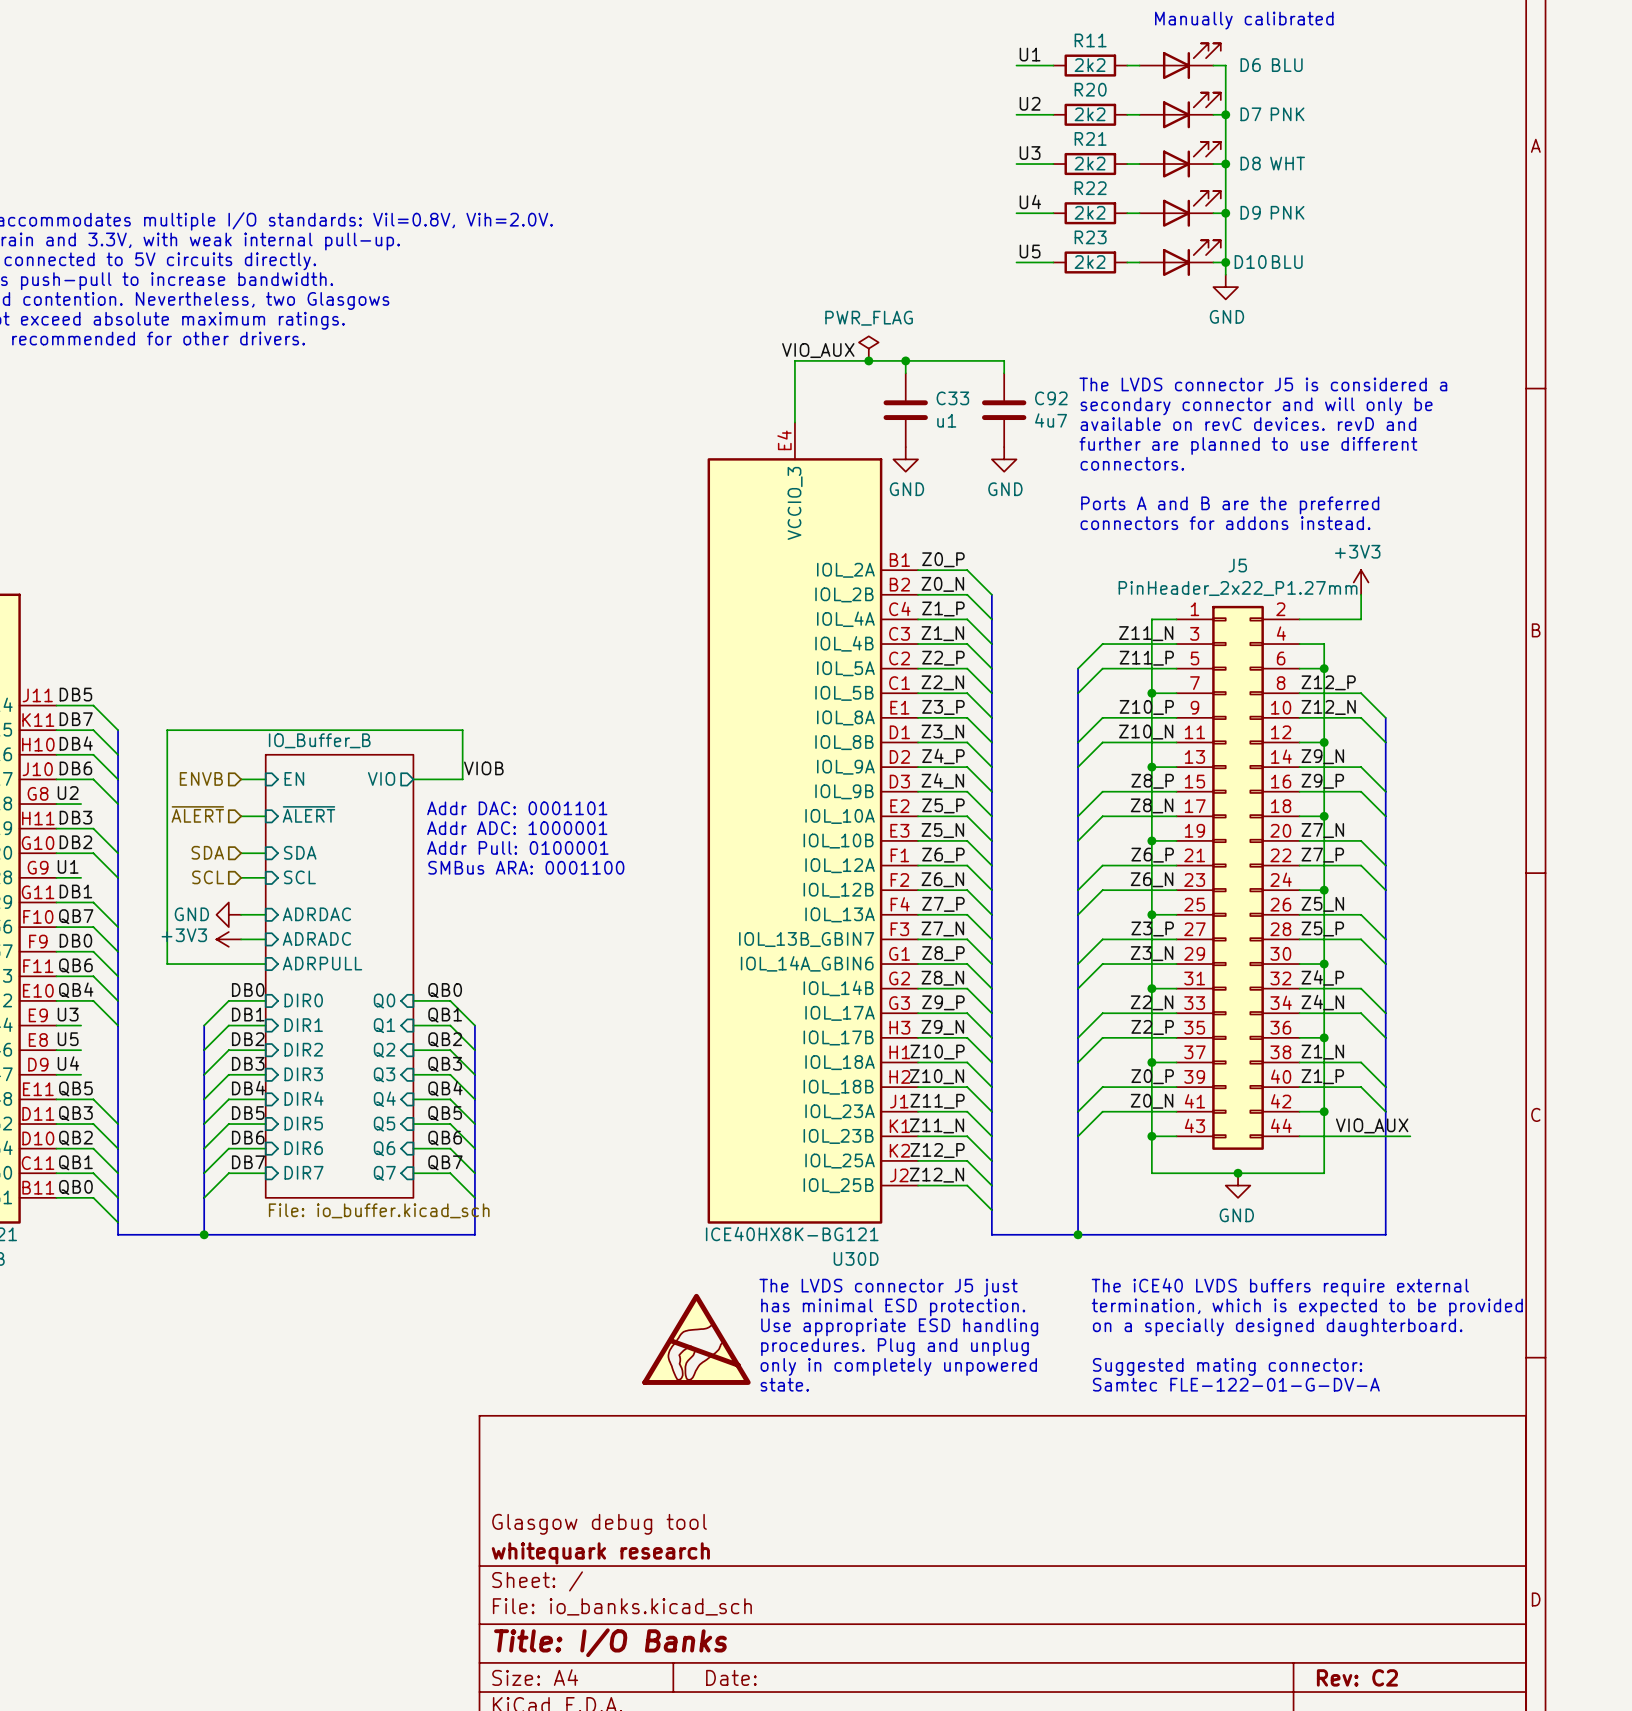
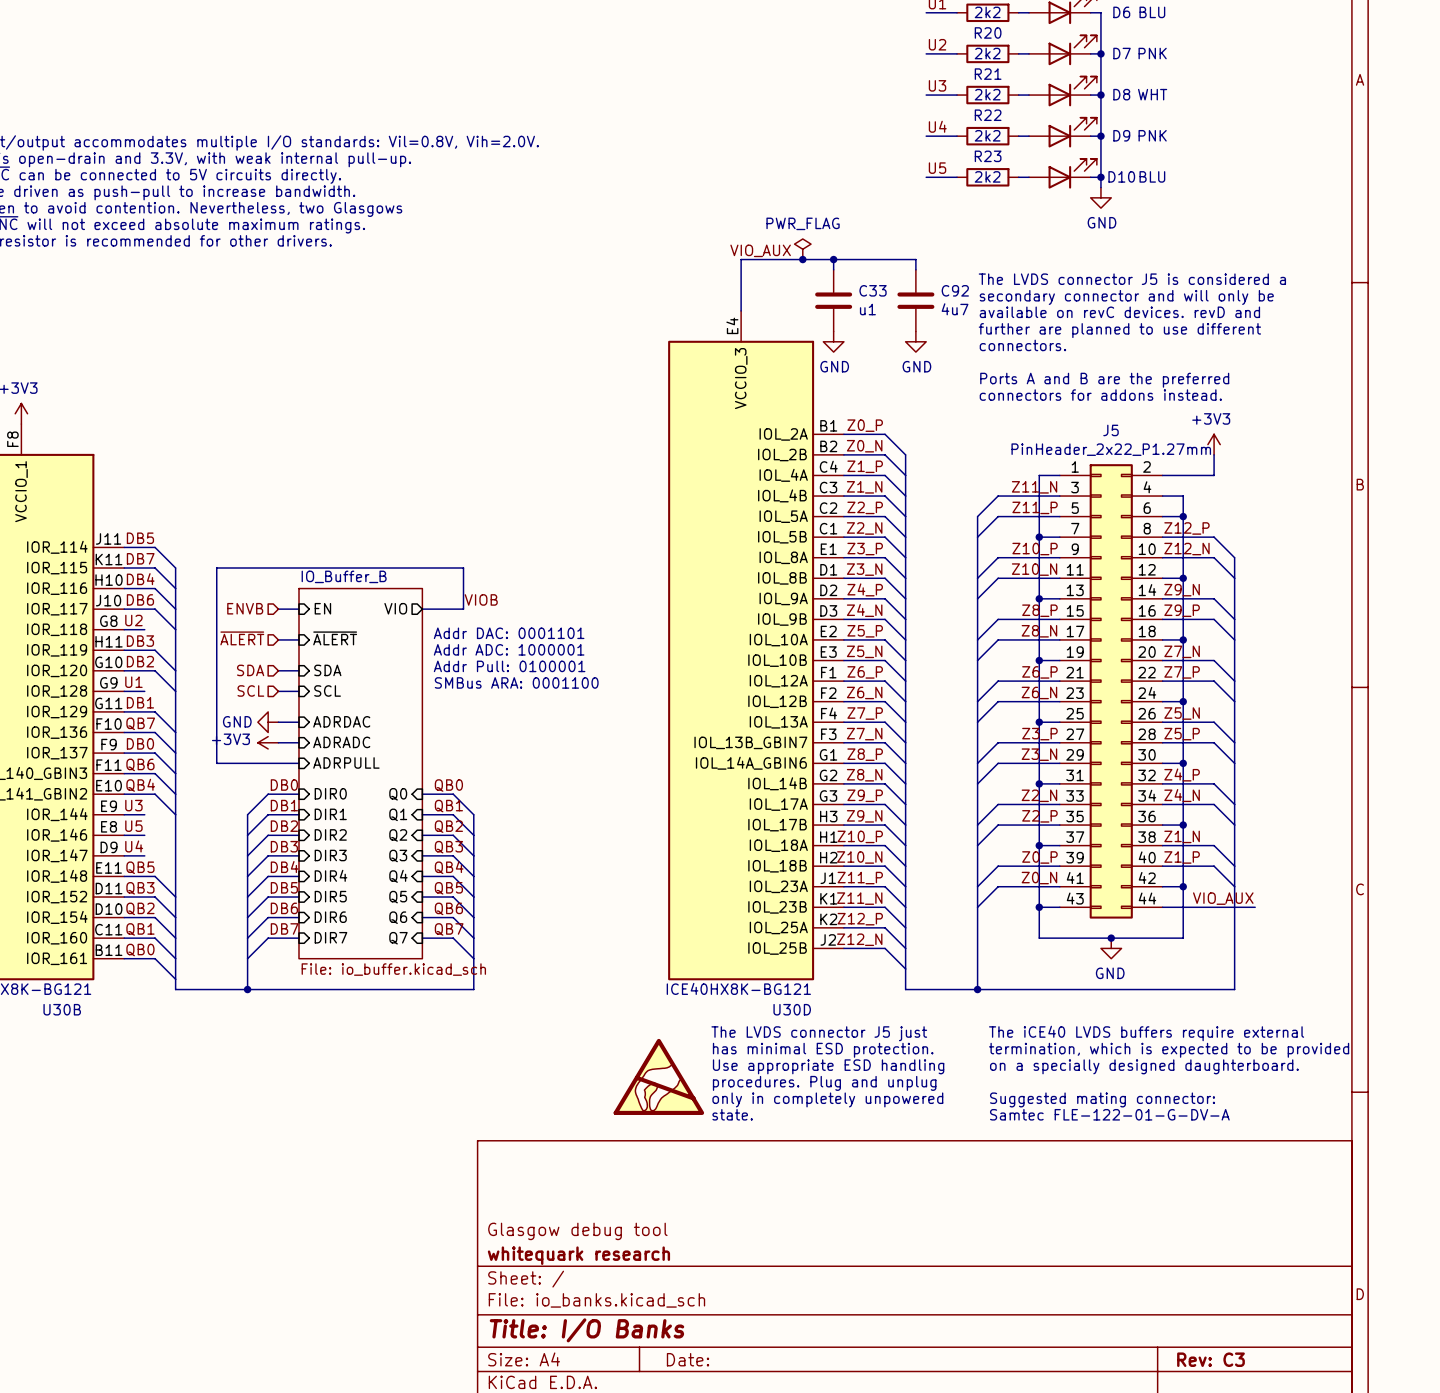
title block: Rev: C2 (1357, 1677) -> Rev: C3 (1210, 1359)

